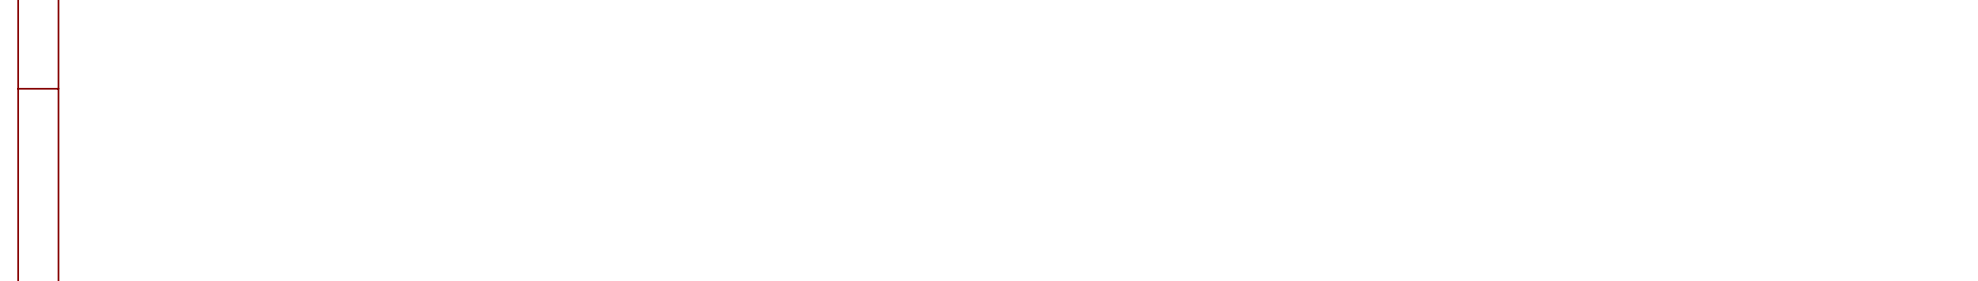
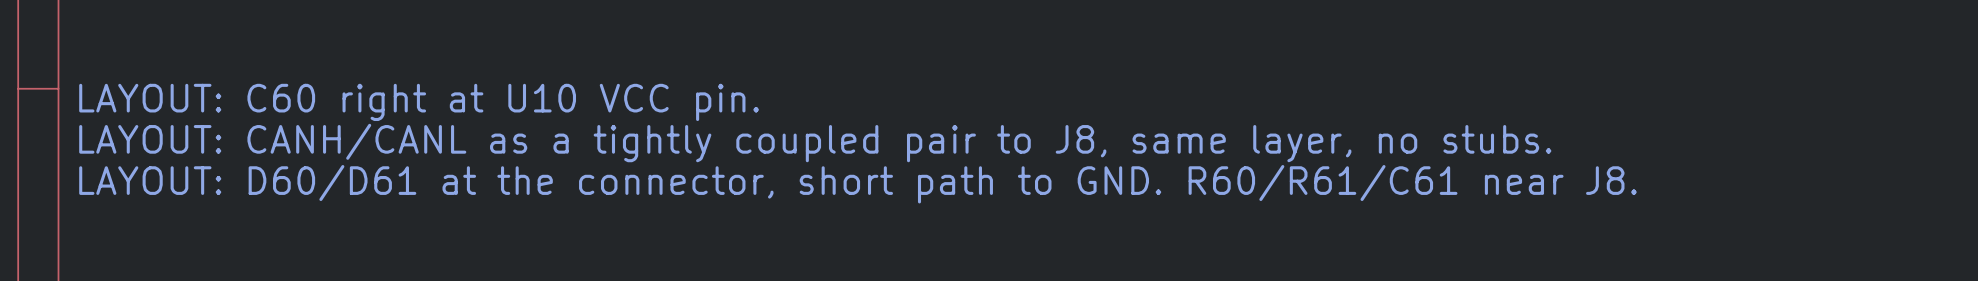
text: none -> LAYOUT: C60 right at U10 VCC pin. (419, 102)
text: none -> LAYOUT: CANH/CANL as a tightly coupled pair to J8, same layer, no stubs. (815, 143)
text: none -> LAYOUT: D60/D61 at the connector, short path to GND. R60/R61/C61 near J8. (857, 184)

